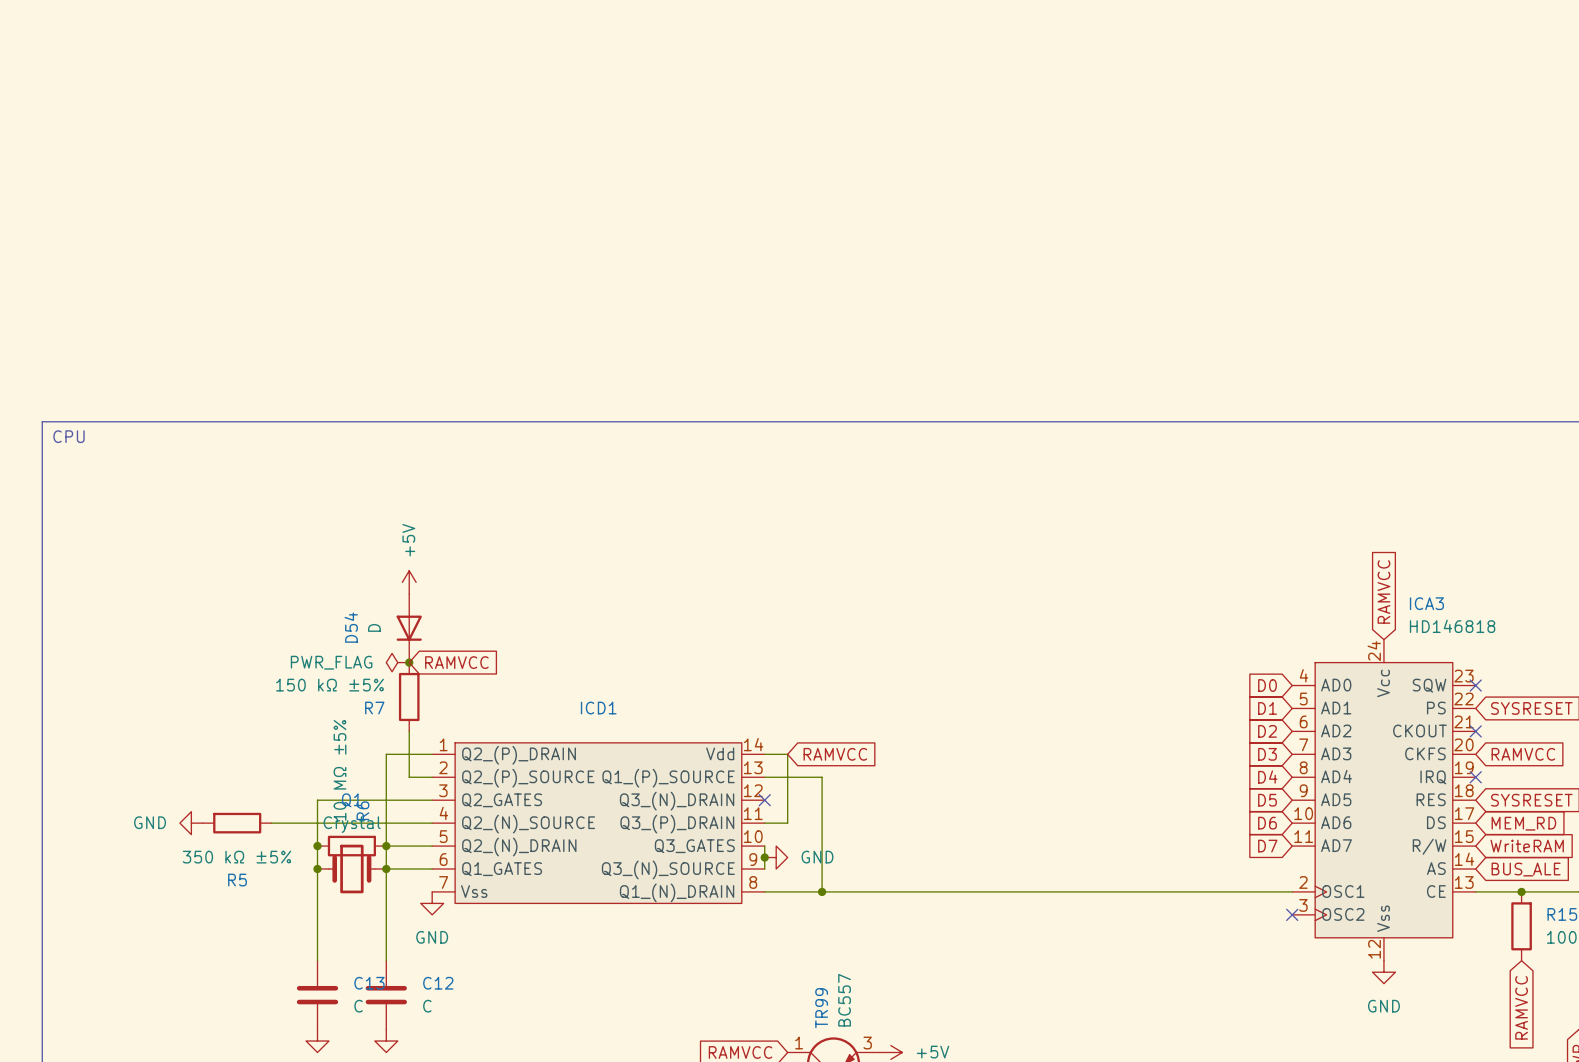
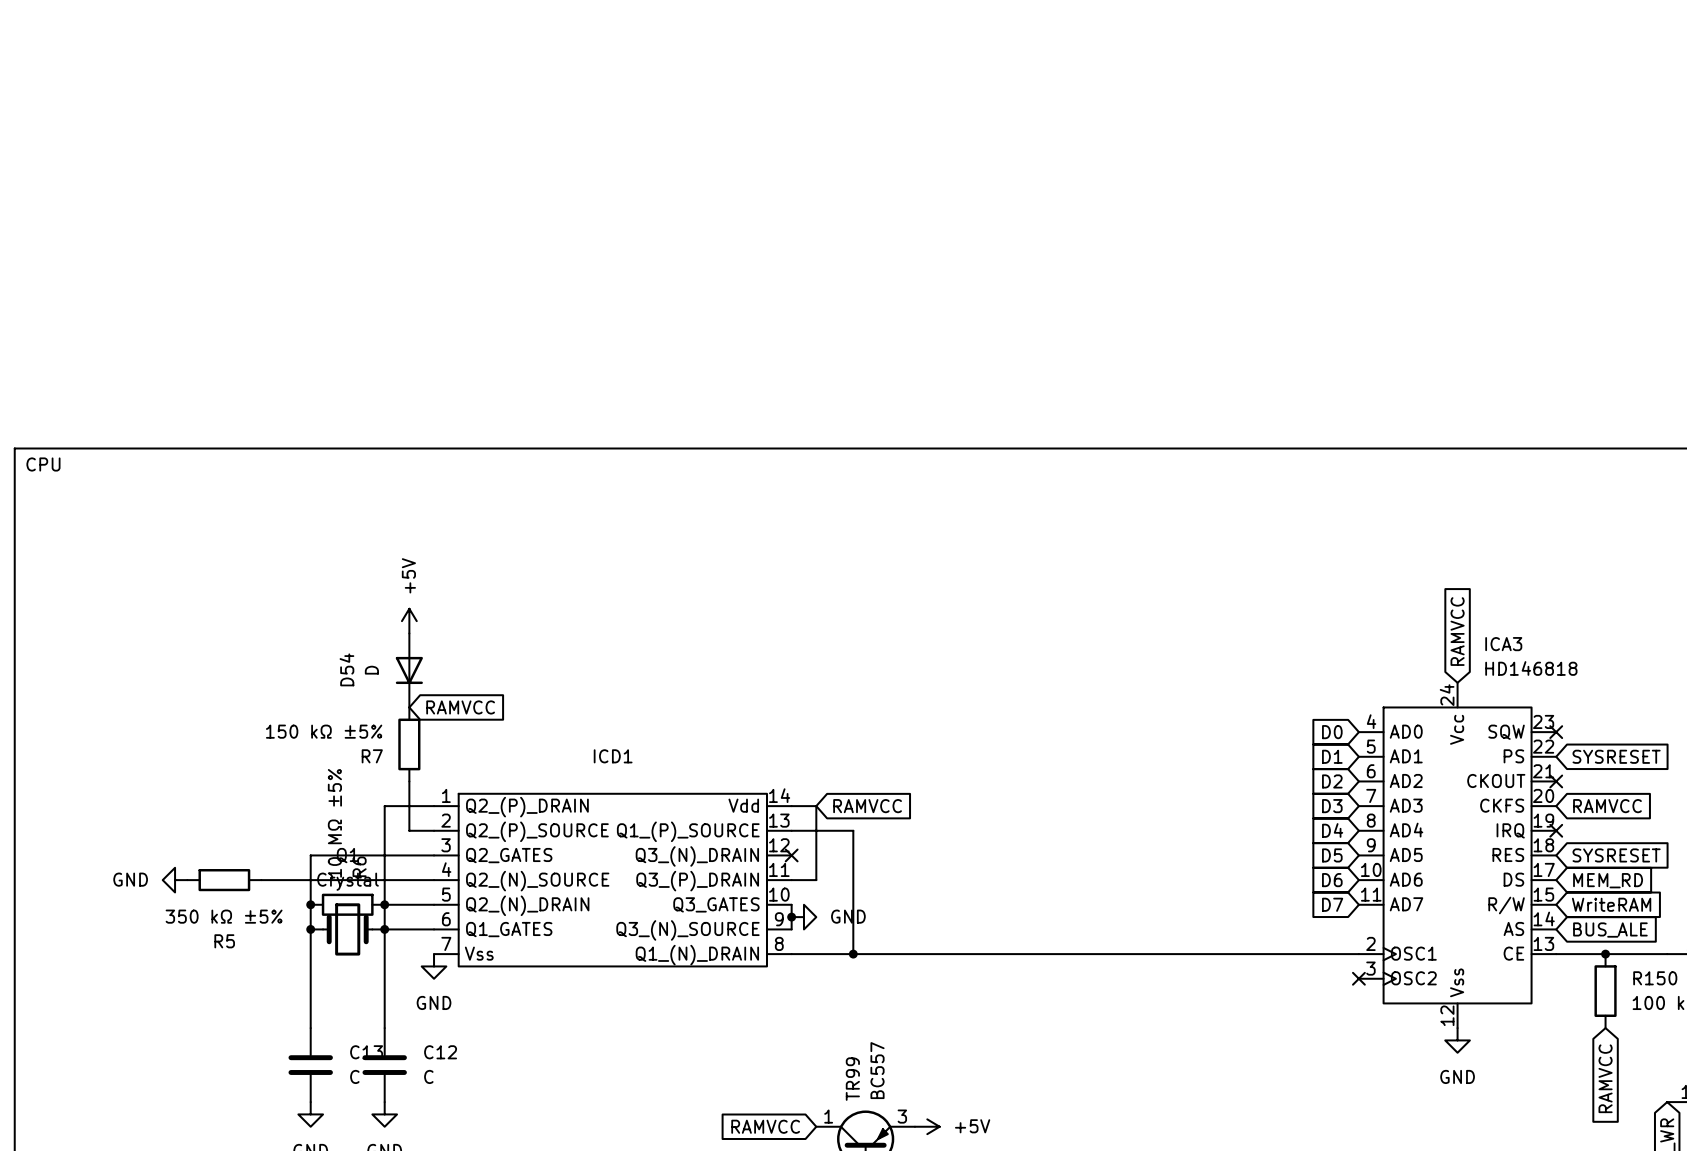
power symbol: PWR_FLAG (397, 662) -> none
junction: (409, 662) -> none

